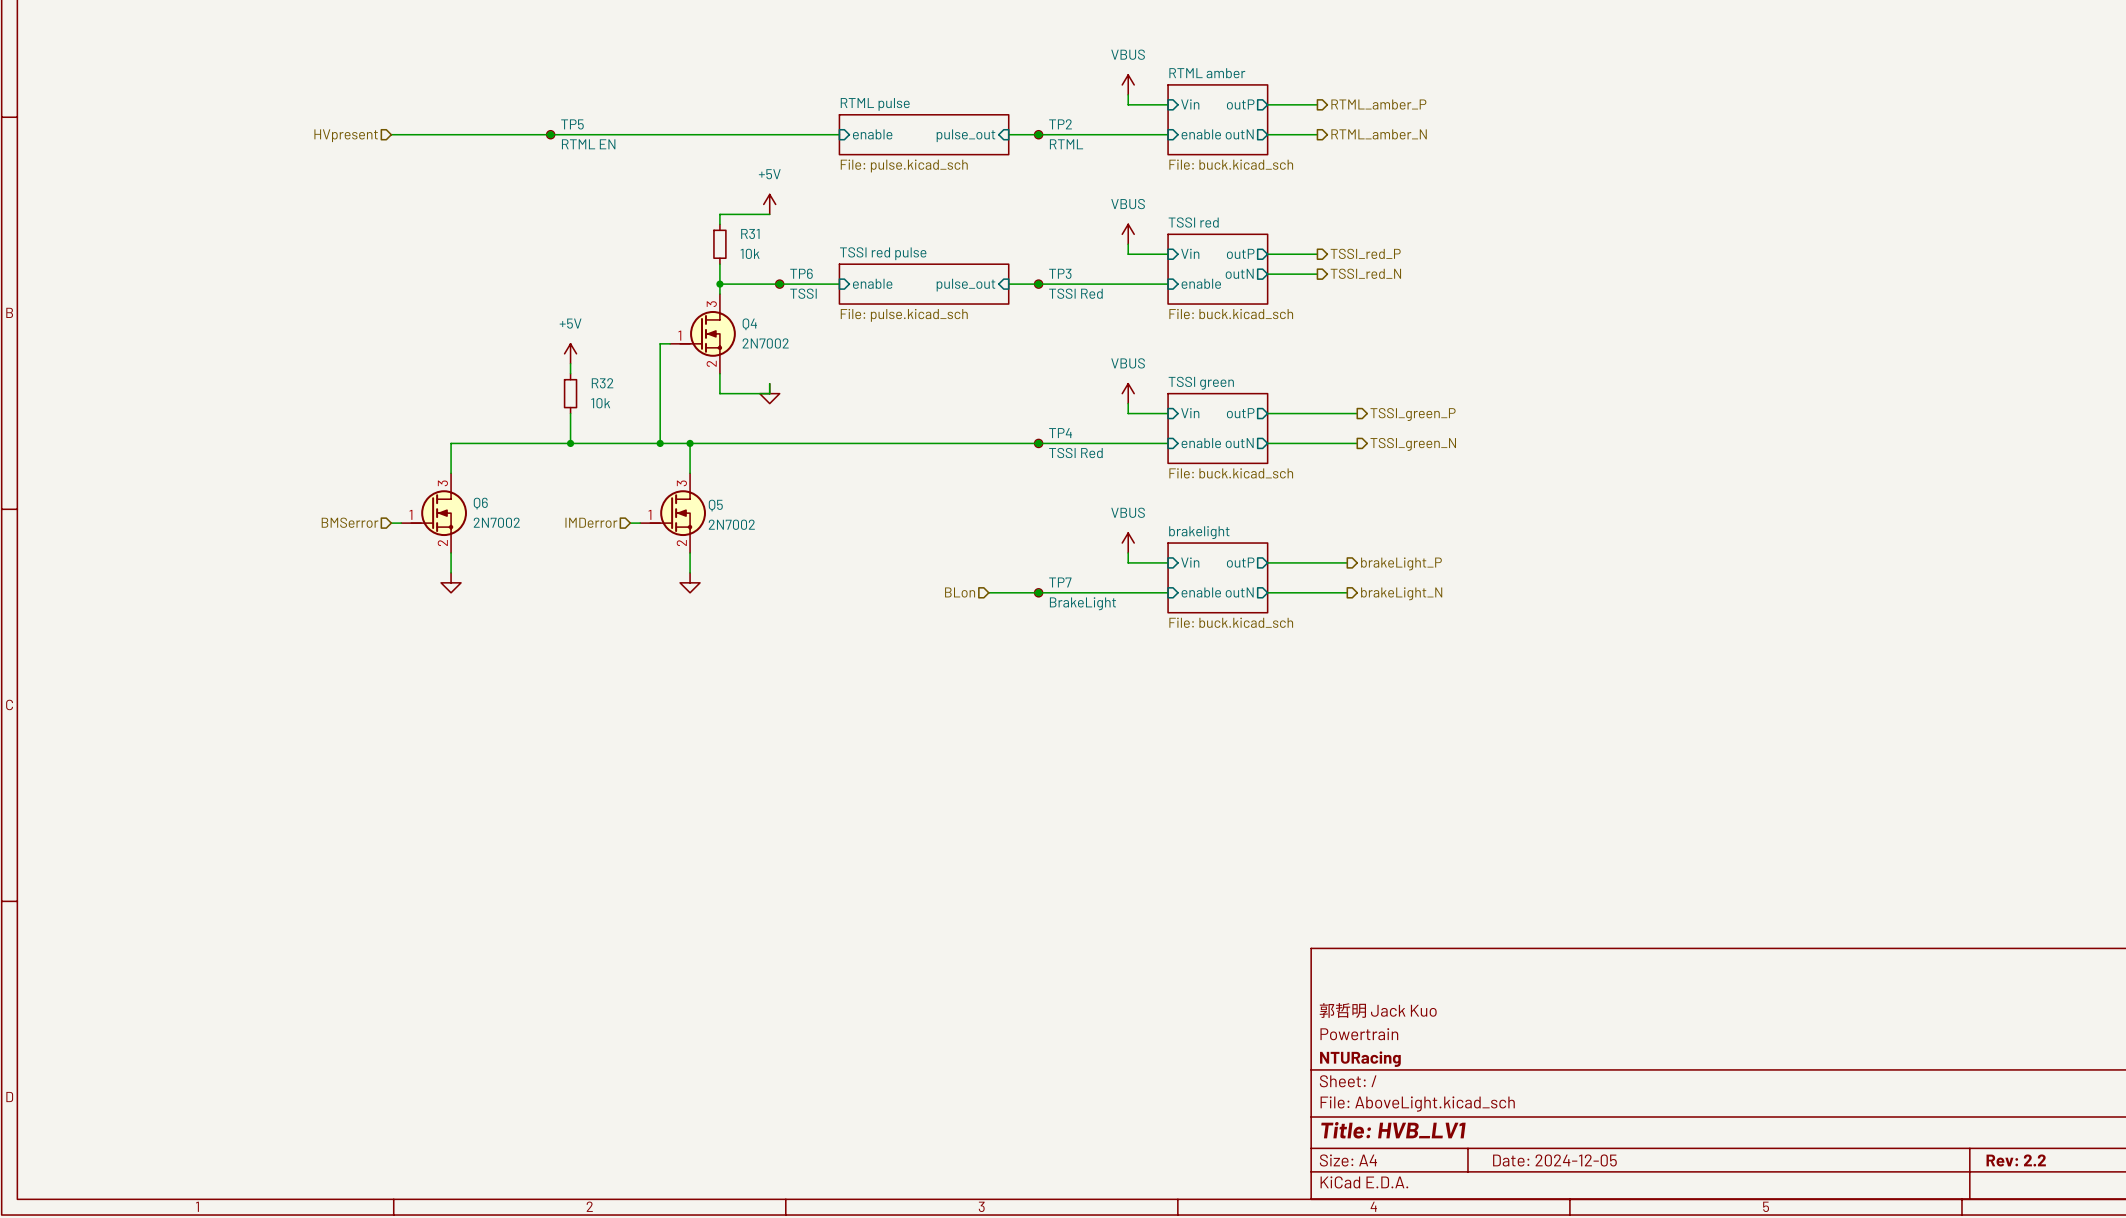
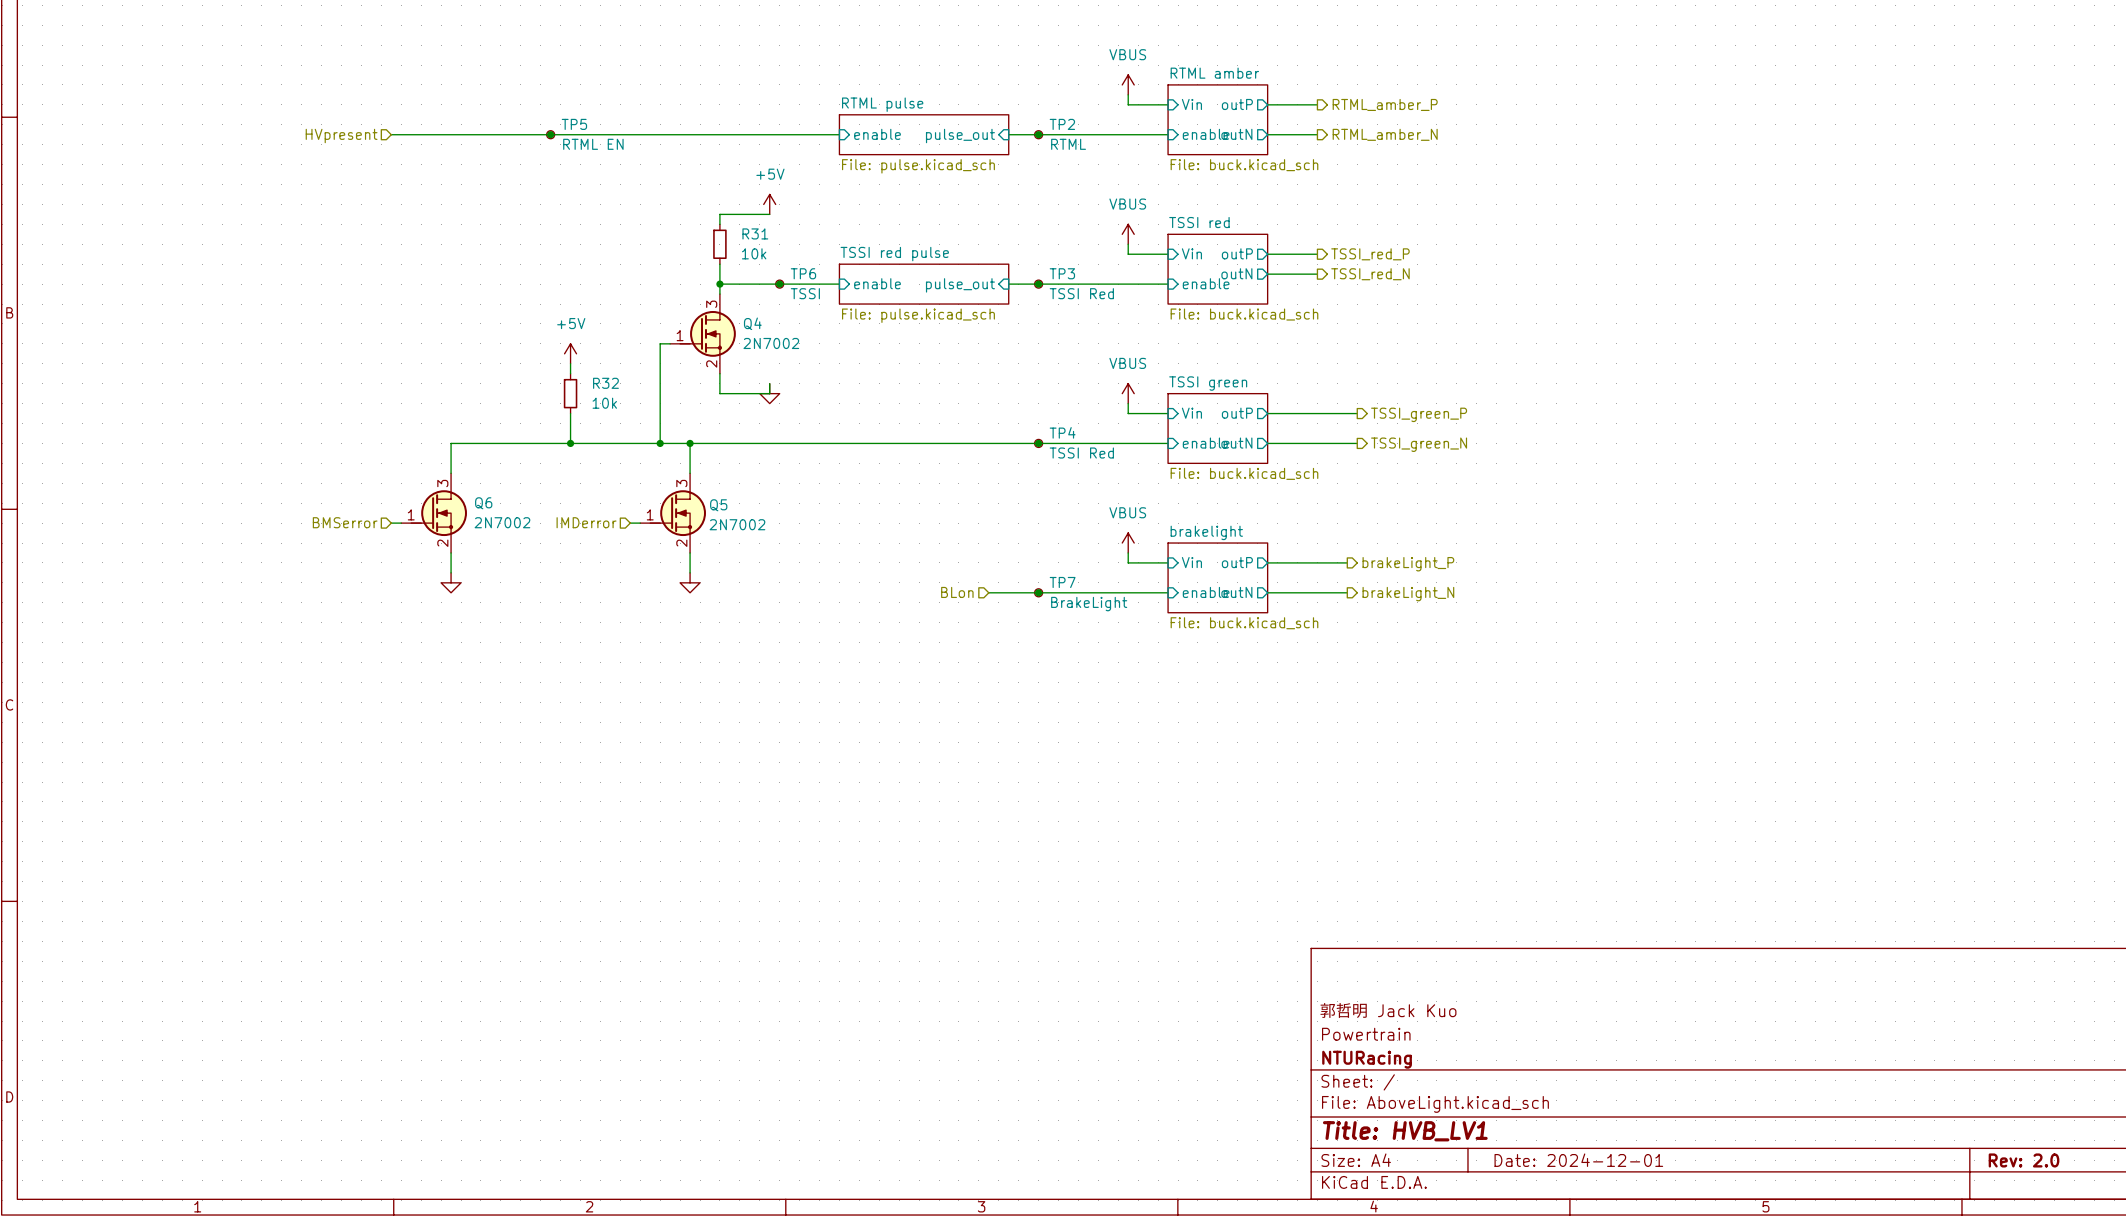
title block: Date: 2024-12-05 (1554, 1160) -> Date: 2024-12-01 (1578, 1160)
title block: Rev: 2.2 (2016, 1160) -> Rev: 2.0 (2024, 1160)

